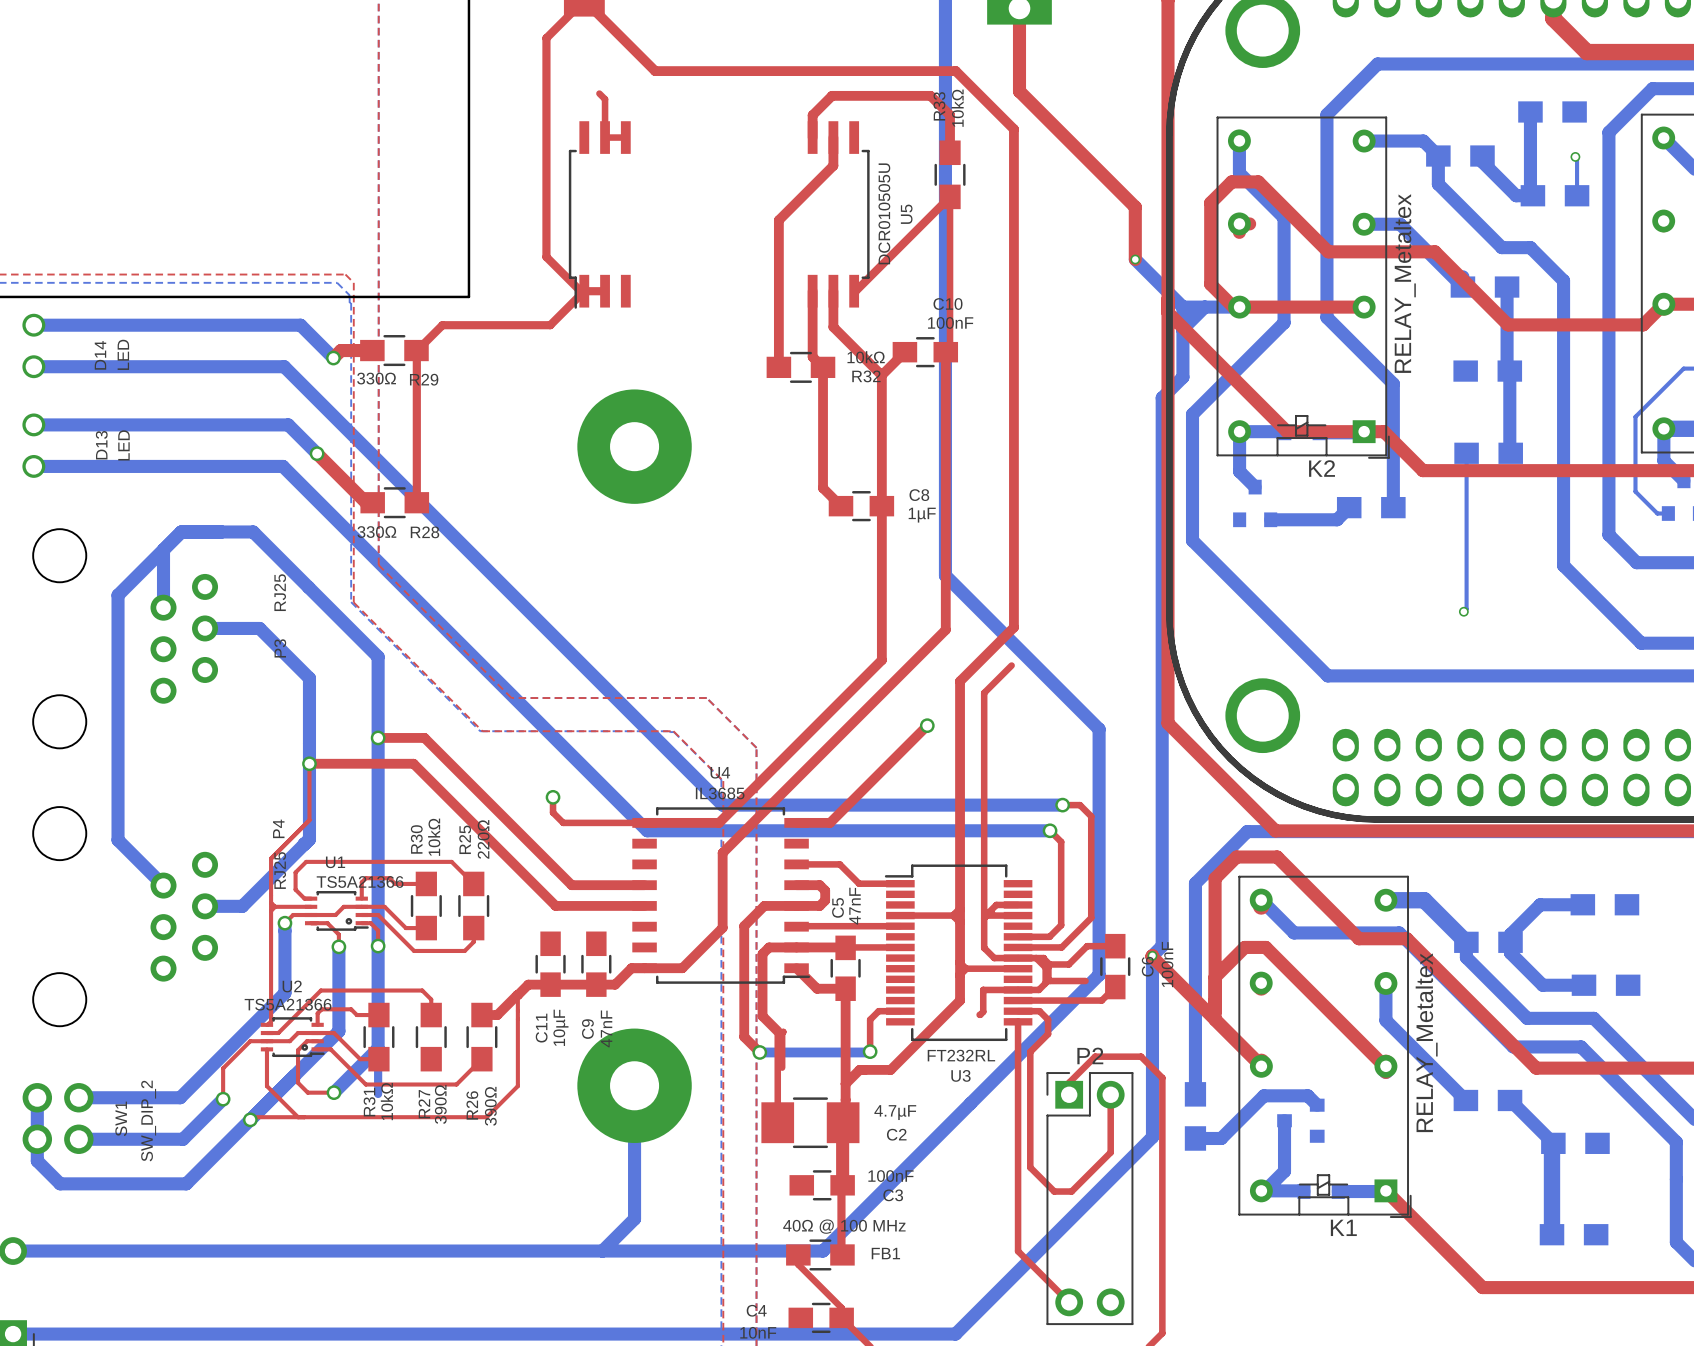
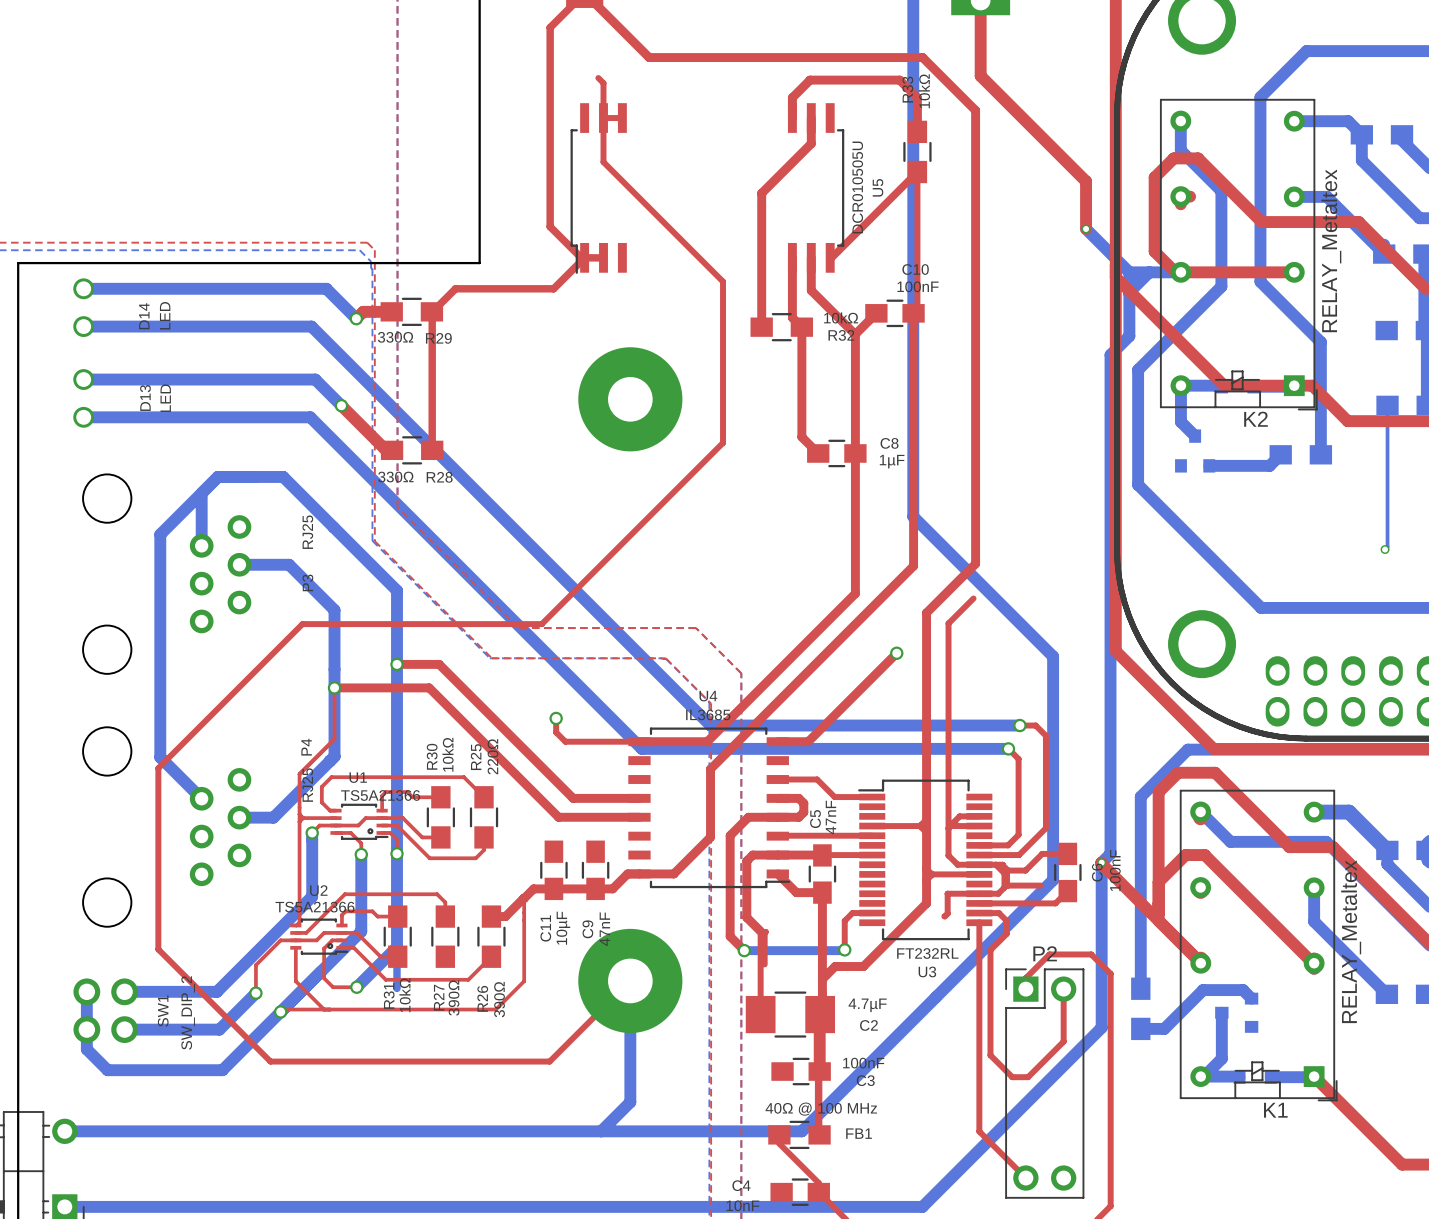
top track: none -> (603, 118) (603, 162) (723, 281) (723, 442) (541, 624) (302, 624) (158, 768) (158, 949) (270, 1061) (549, 1061) (630, 980)

